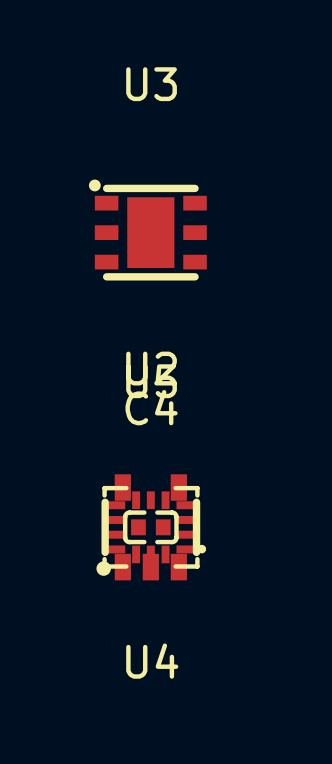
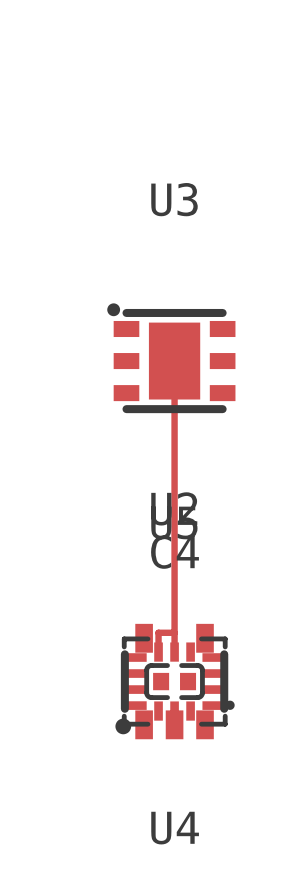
track: none -> (174, 361) (174, 652)
track: none -> (174, 632) (158, 632) (158, 652)

